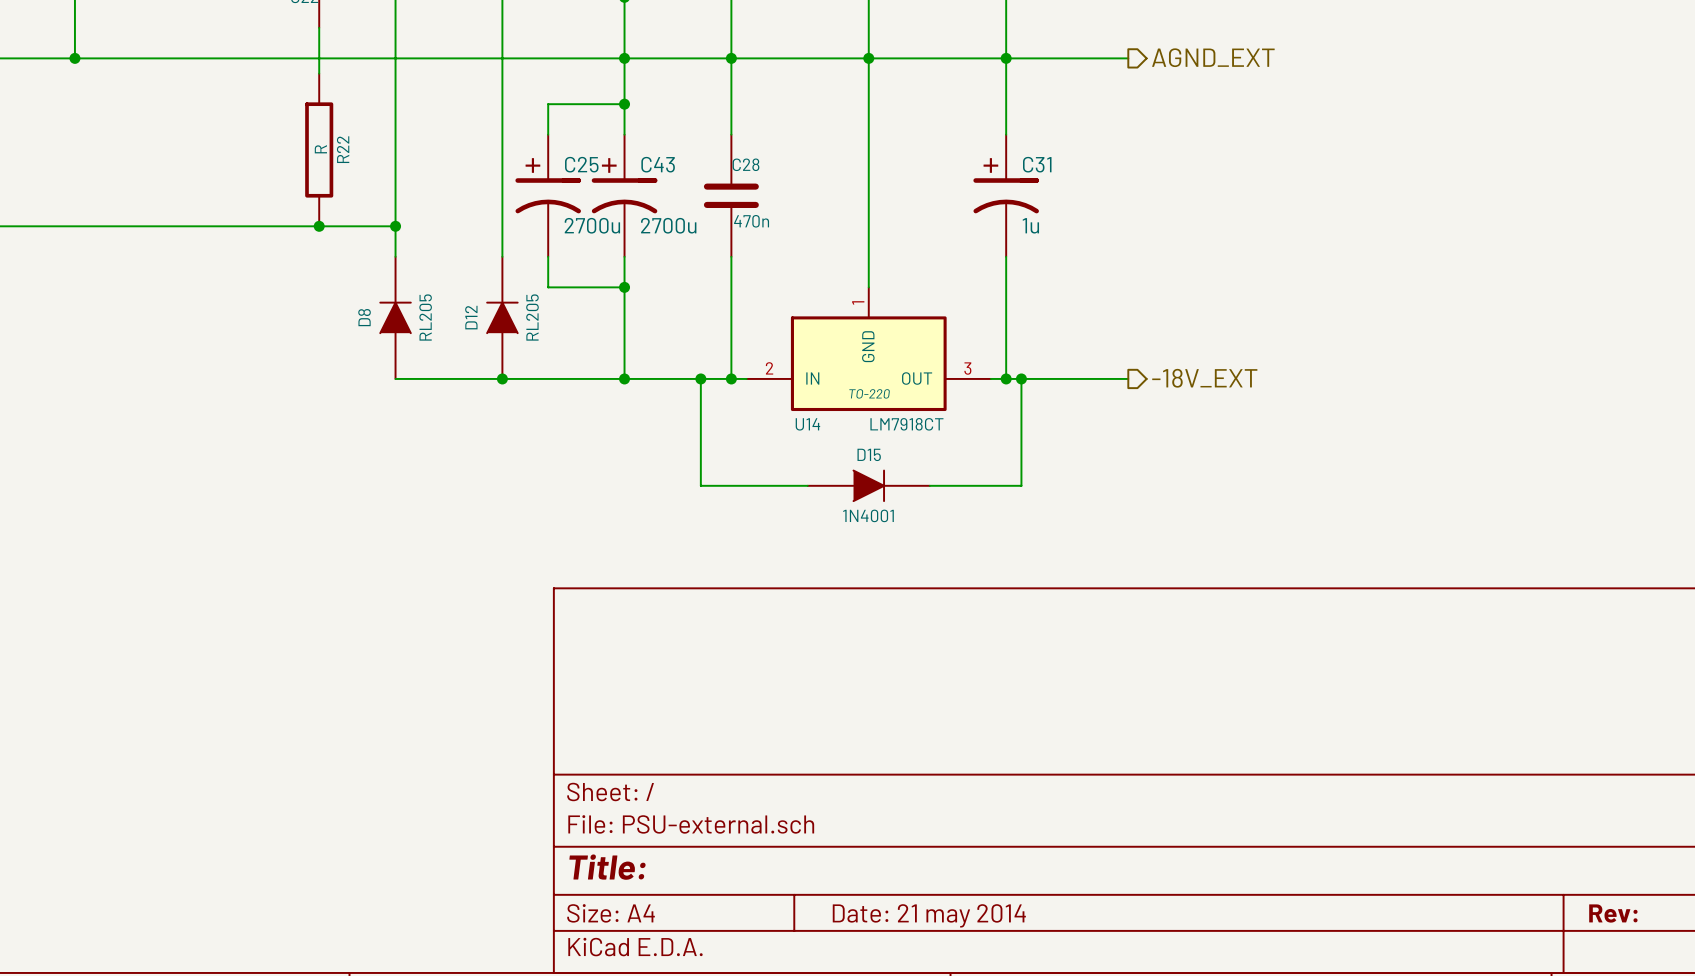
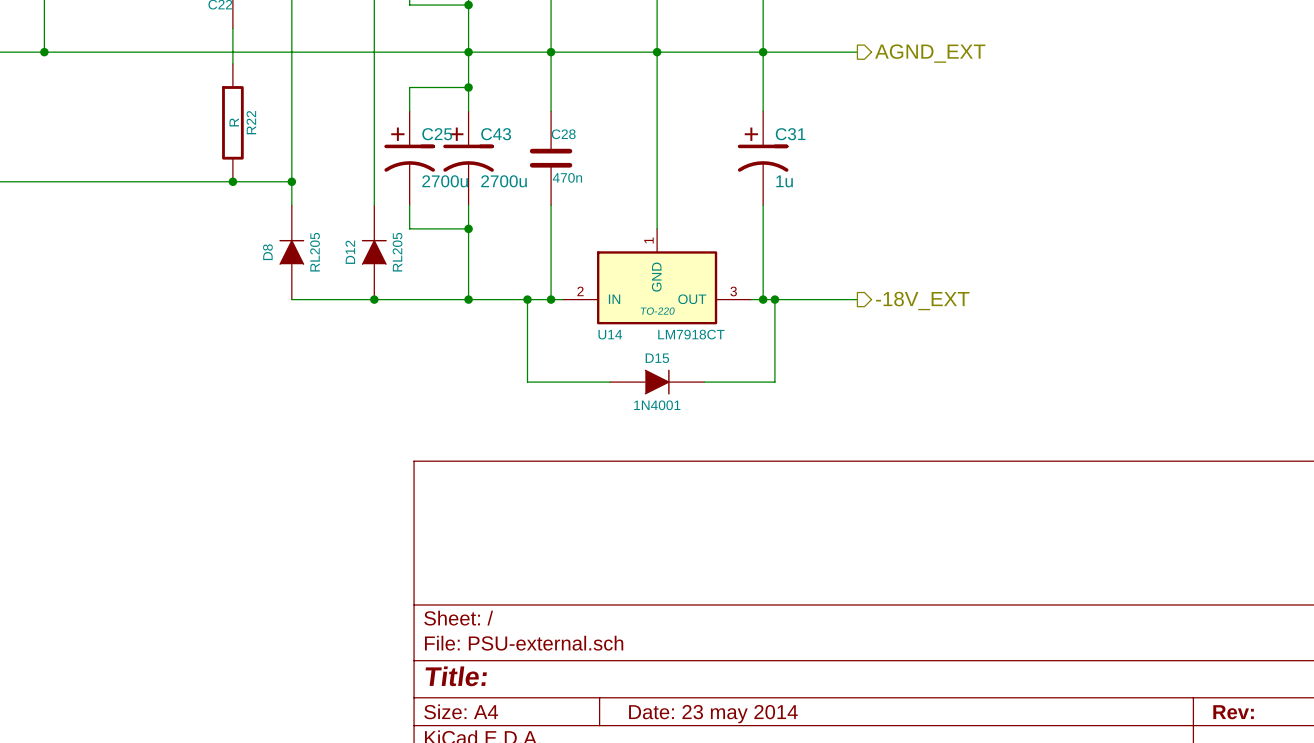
title block: Date: 21 may 2014 (929, 915) -> Date: 23 may 2014 (713, 714)

